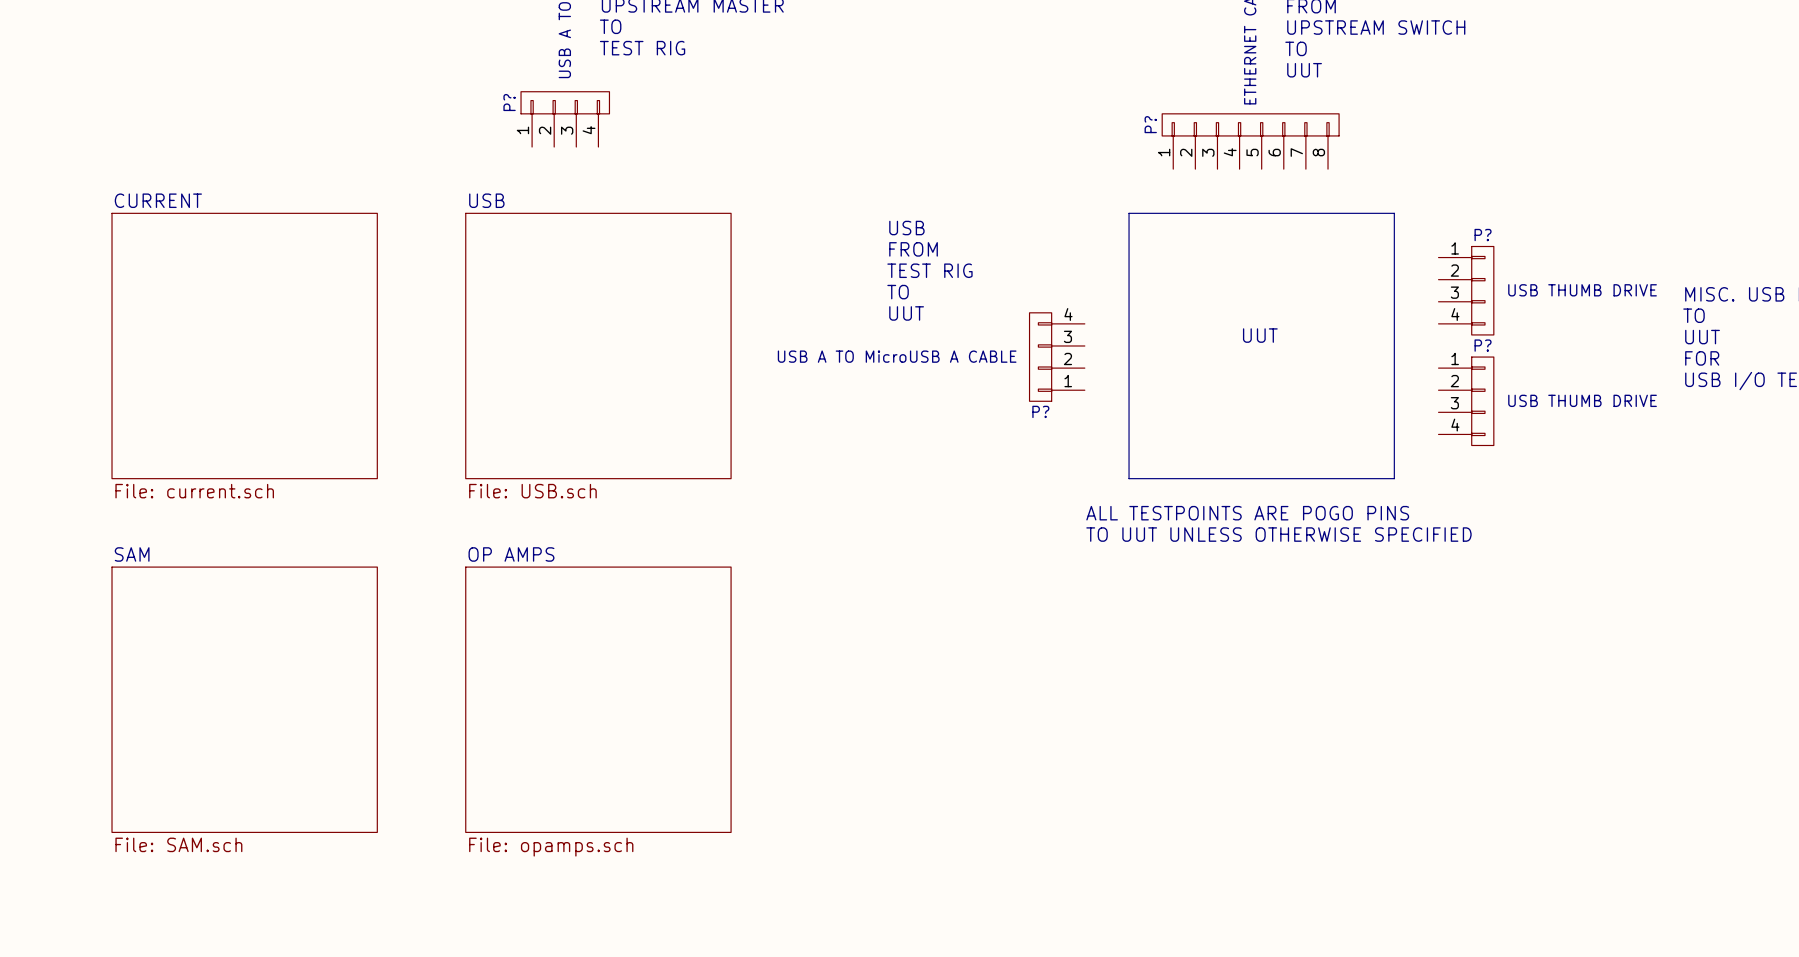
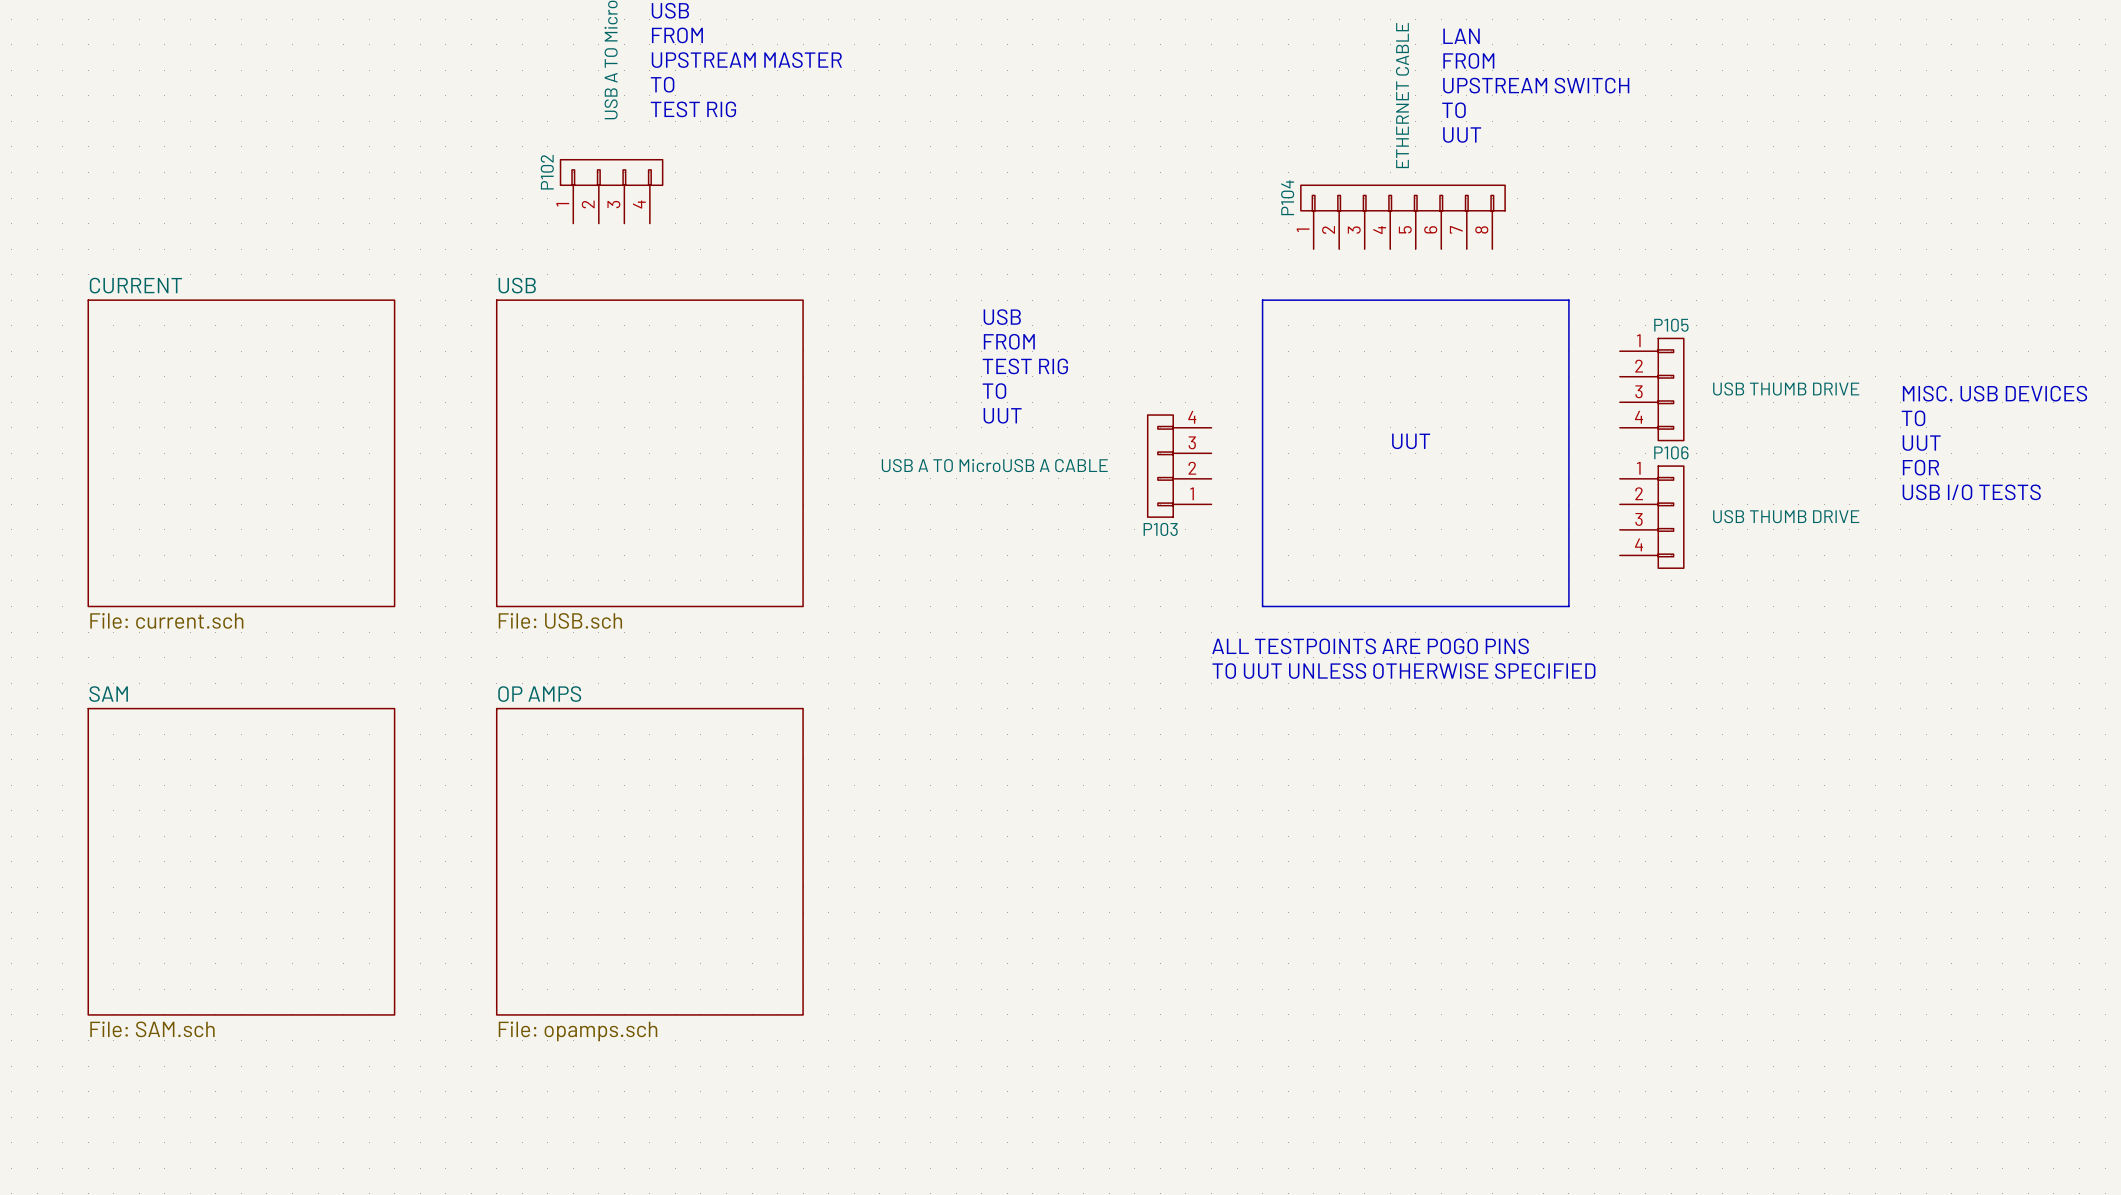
P? name: P? (509, 102) -> P102 (547, 172)
P? name: P? (1150, 124) -> P104 (1287, 197)
P? name: P? (1483, 235) -> P105 (1671, 325)
P? name: P? (1483, 345) -> P106 (1671, 452)
P? name: P? (1040, 411) -> P103 (1160, 529)

